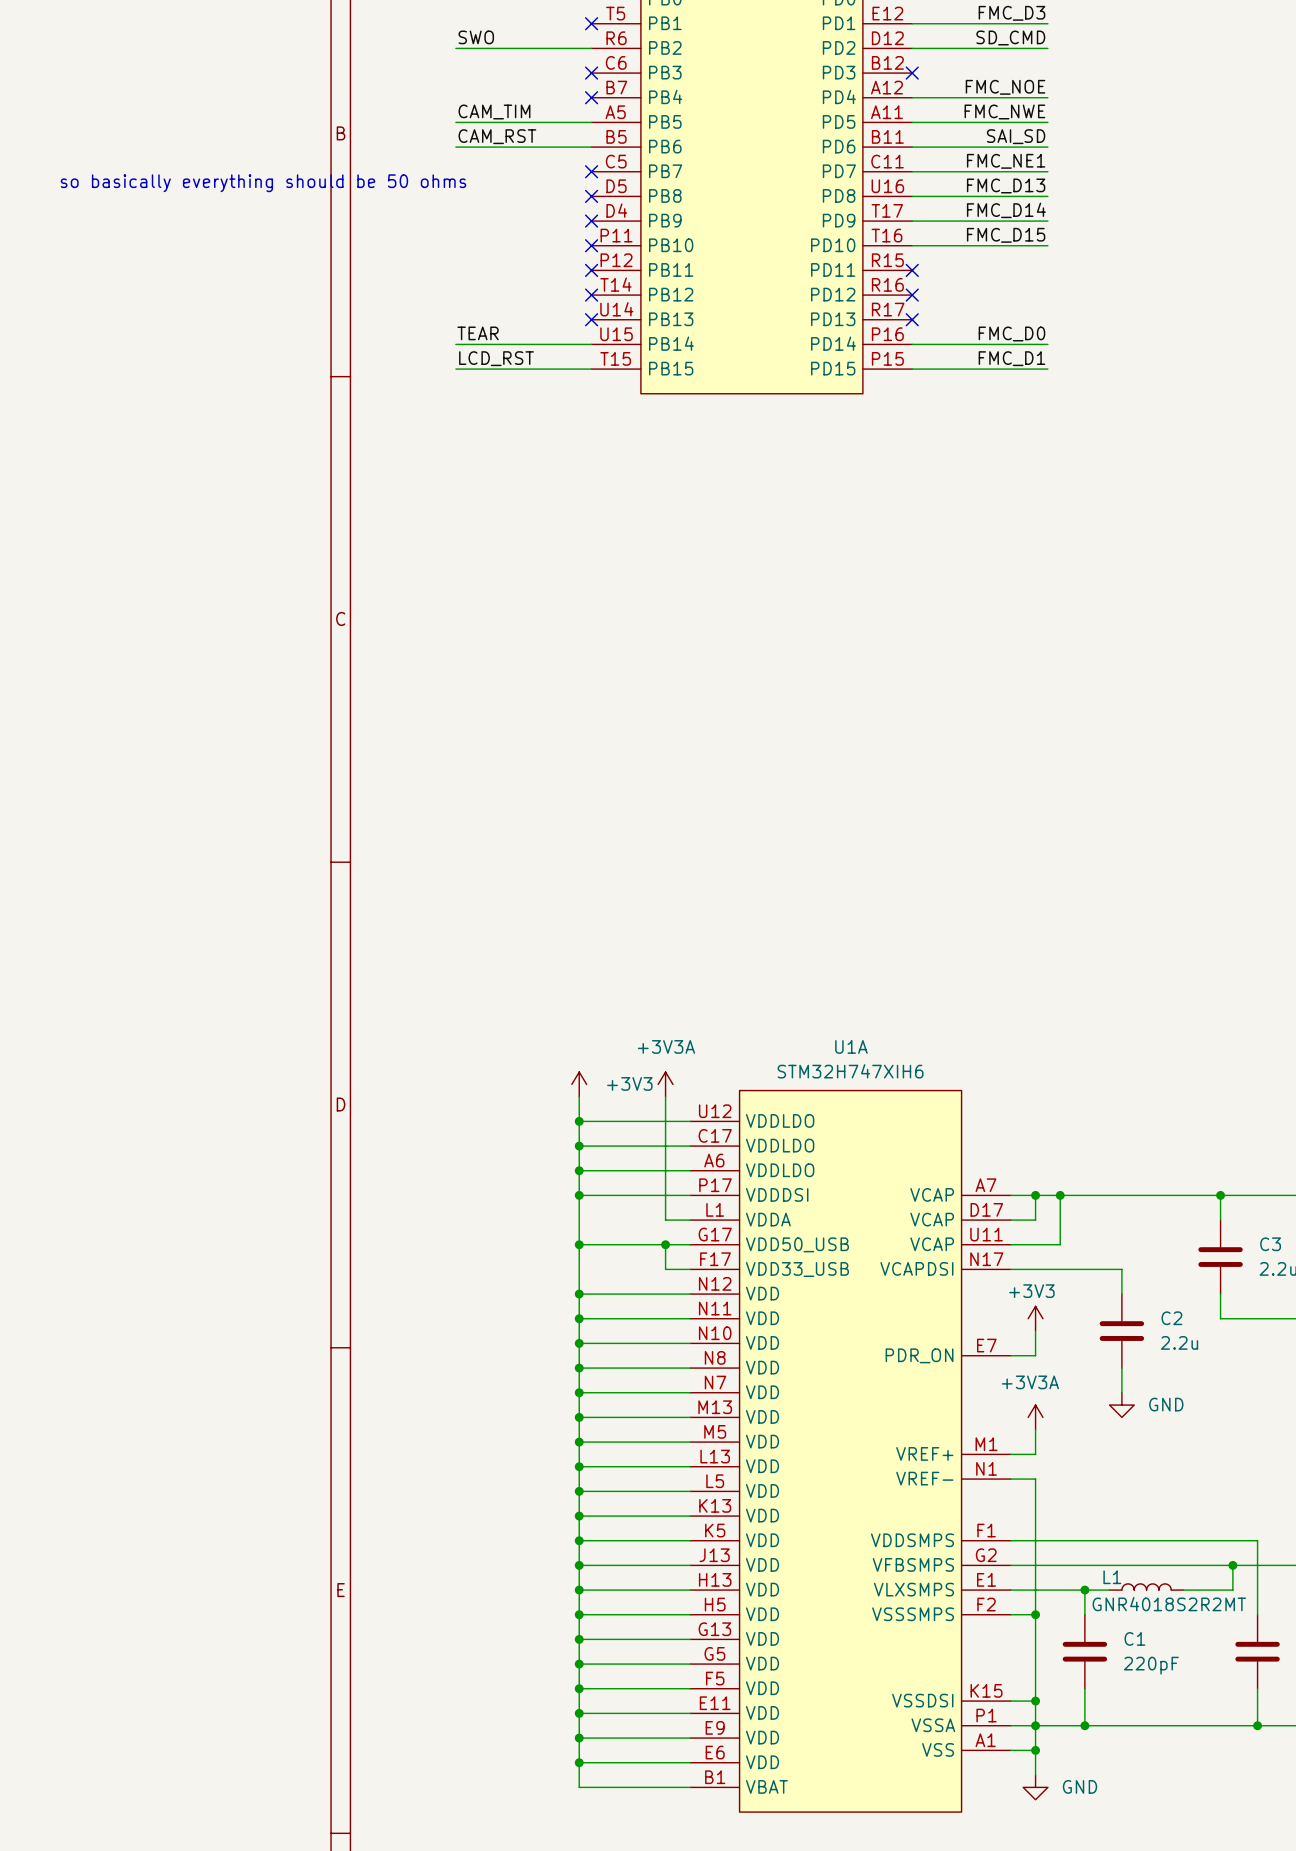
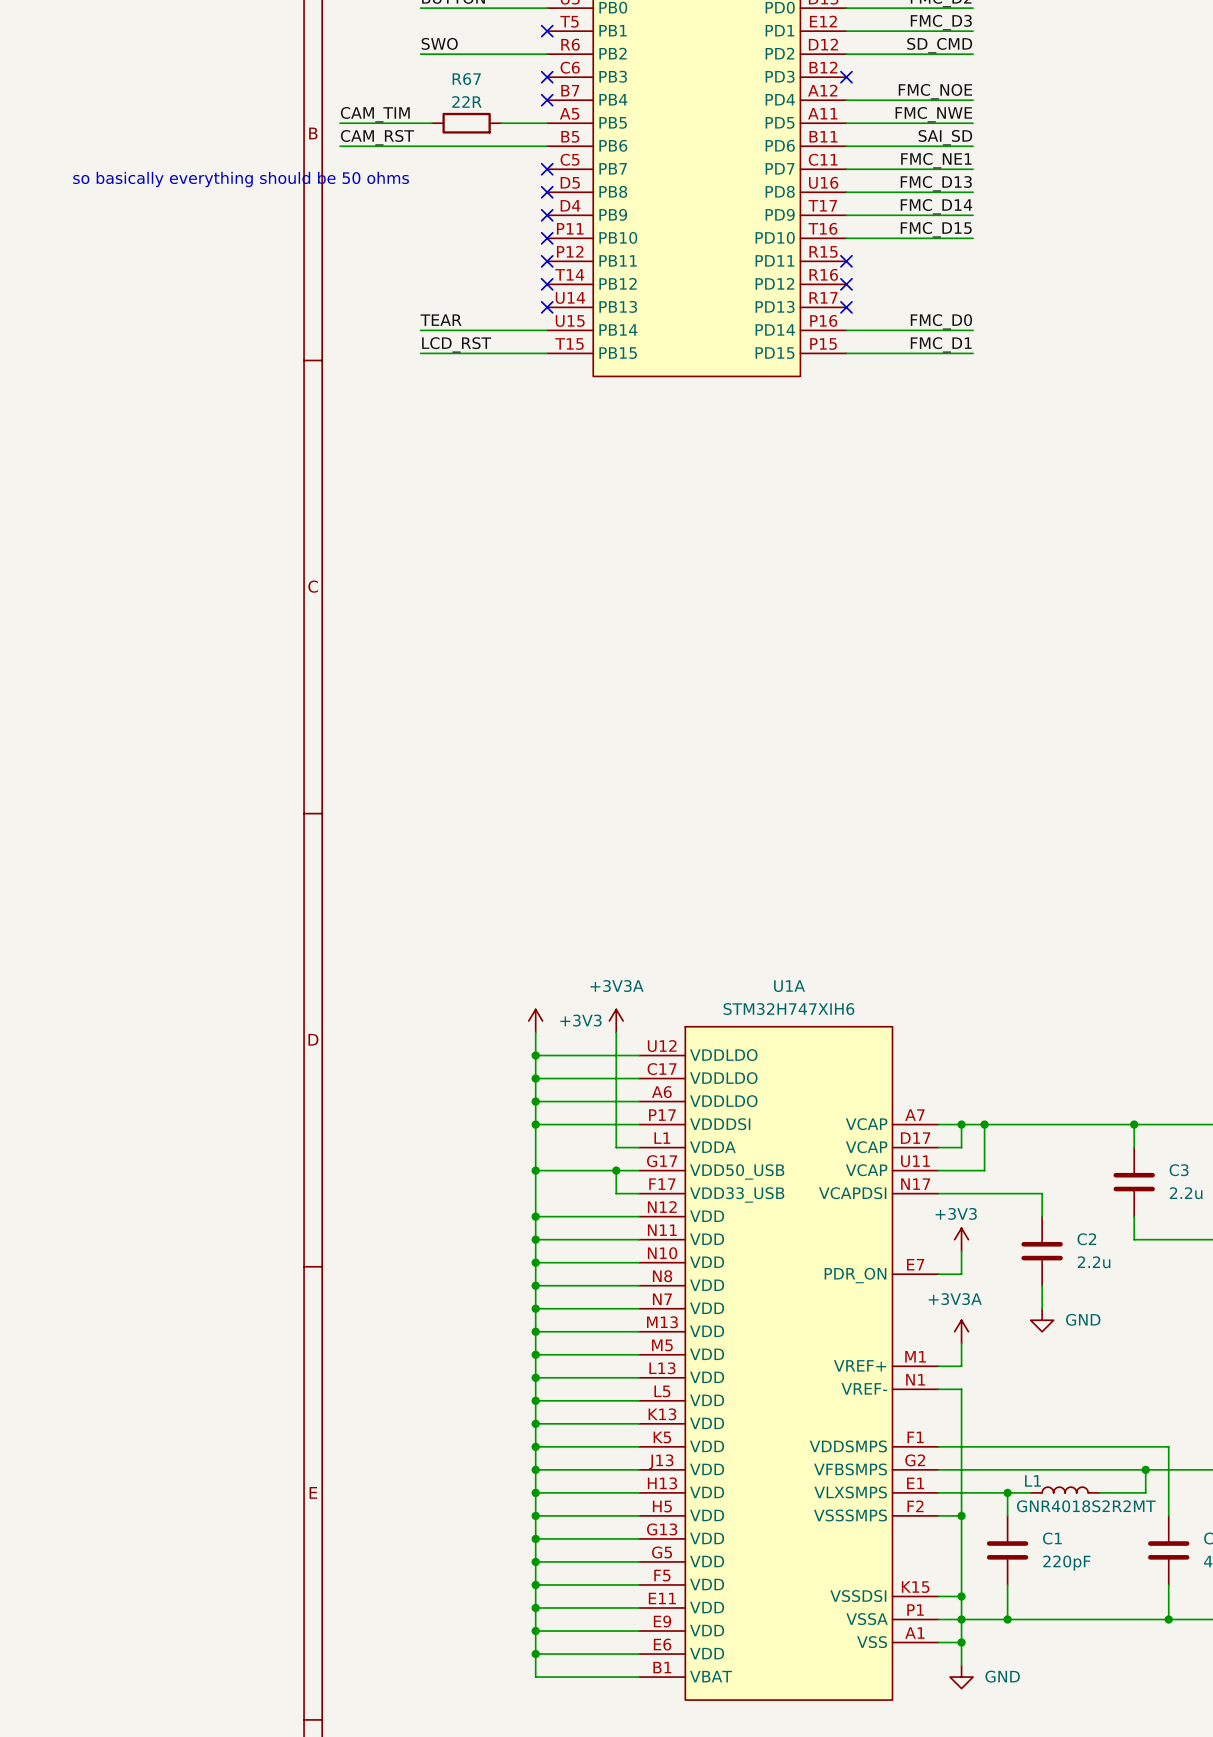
label position: CAM_TIM (494, 111) -> CAM_TIM (375, 114)
wire: none -> (340, 123) (420, 123)
wire: (468, 122) (542, 122) -> none
R67: none -> 22R (466, 123)
label position: CAM_RST (497, 136) -> CAM_RST (377, 137)
wire: none -> (340, 146) (420, 146)

